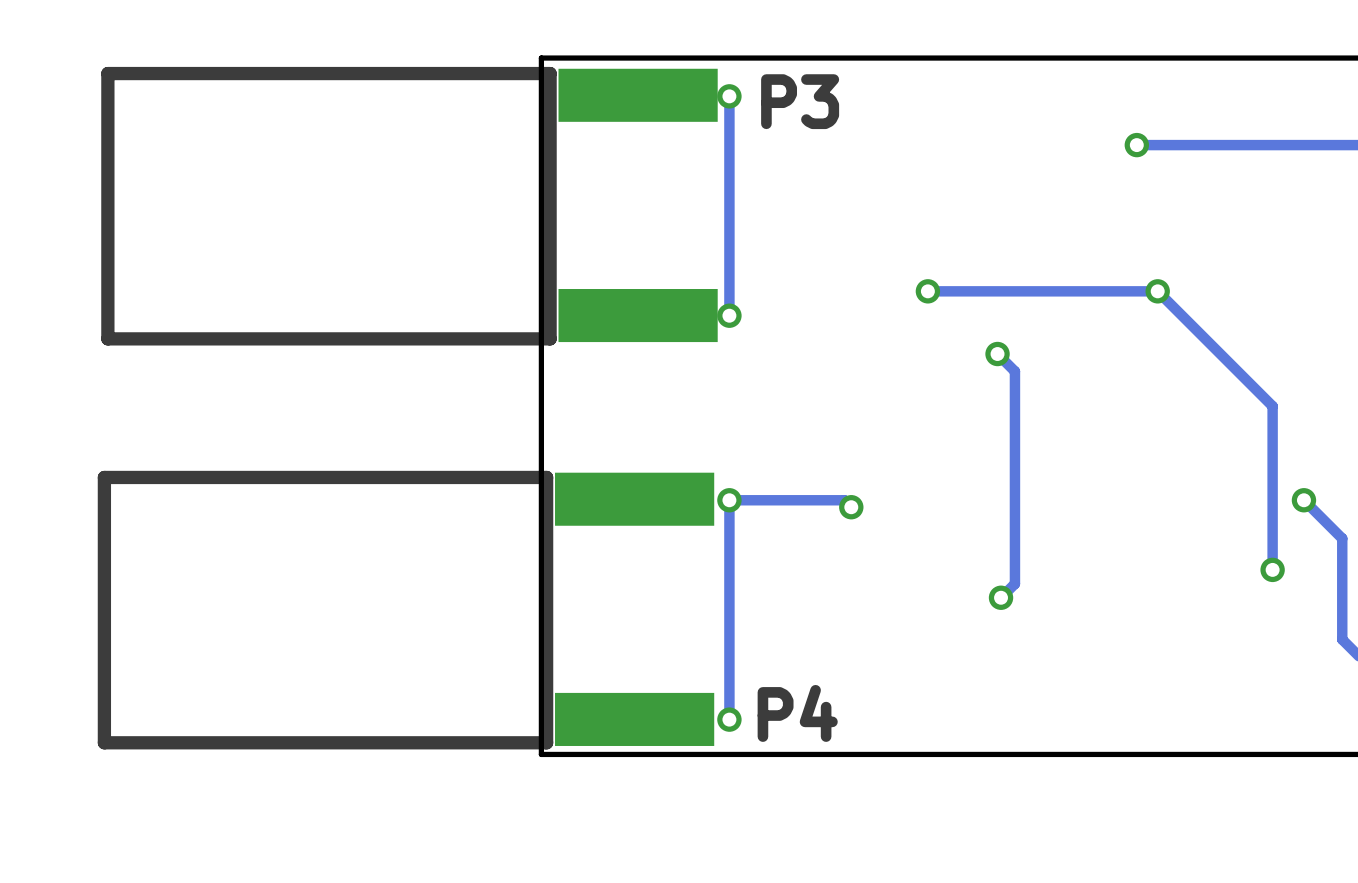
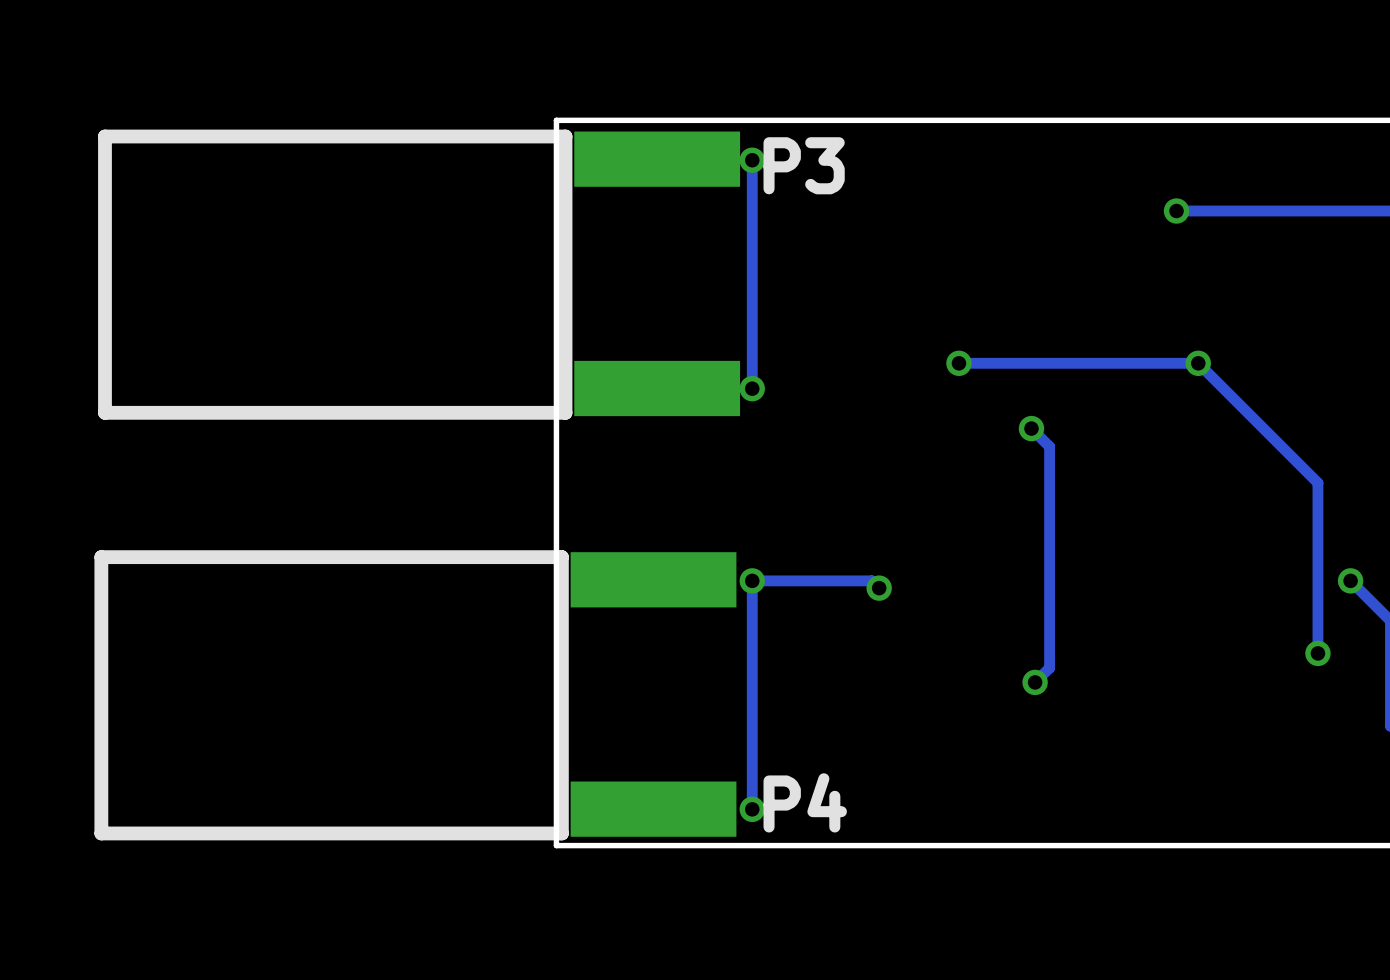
P3 name position: P3 (800, 101) -> P3 (804, 165)
P4 name position: P4 (797, 713) -> P4 (805, 802)

